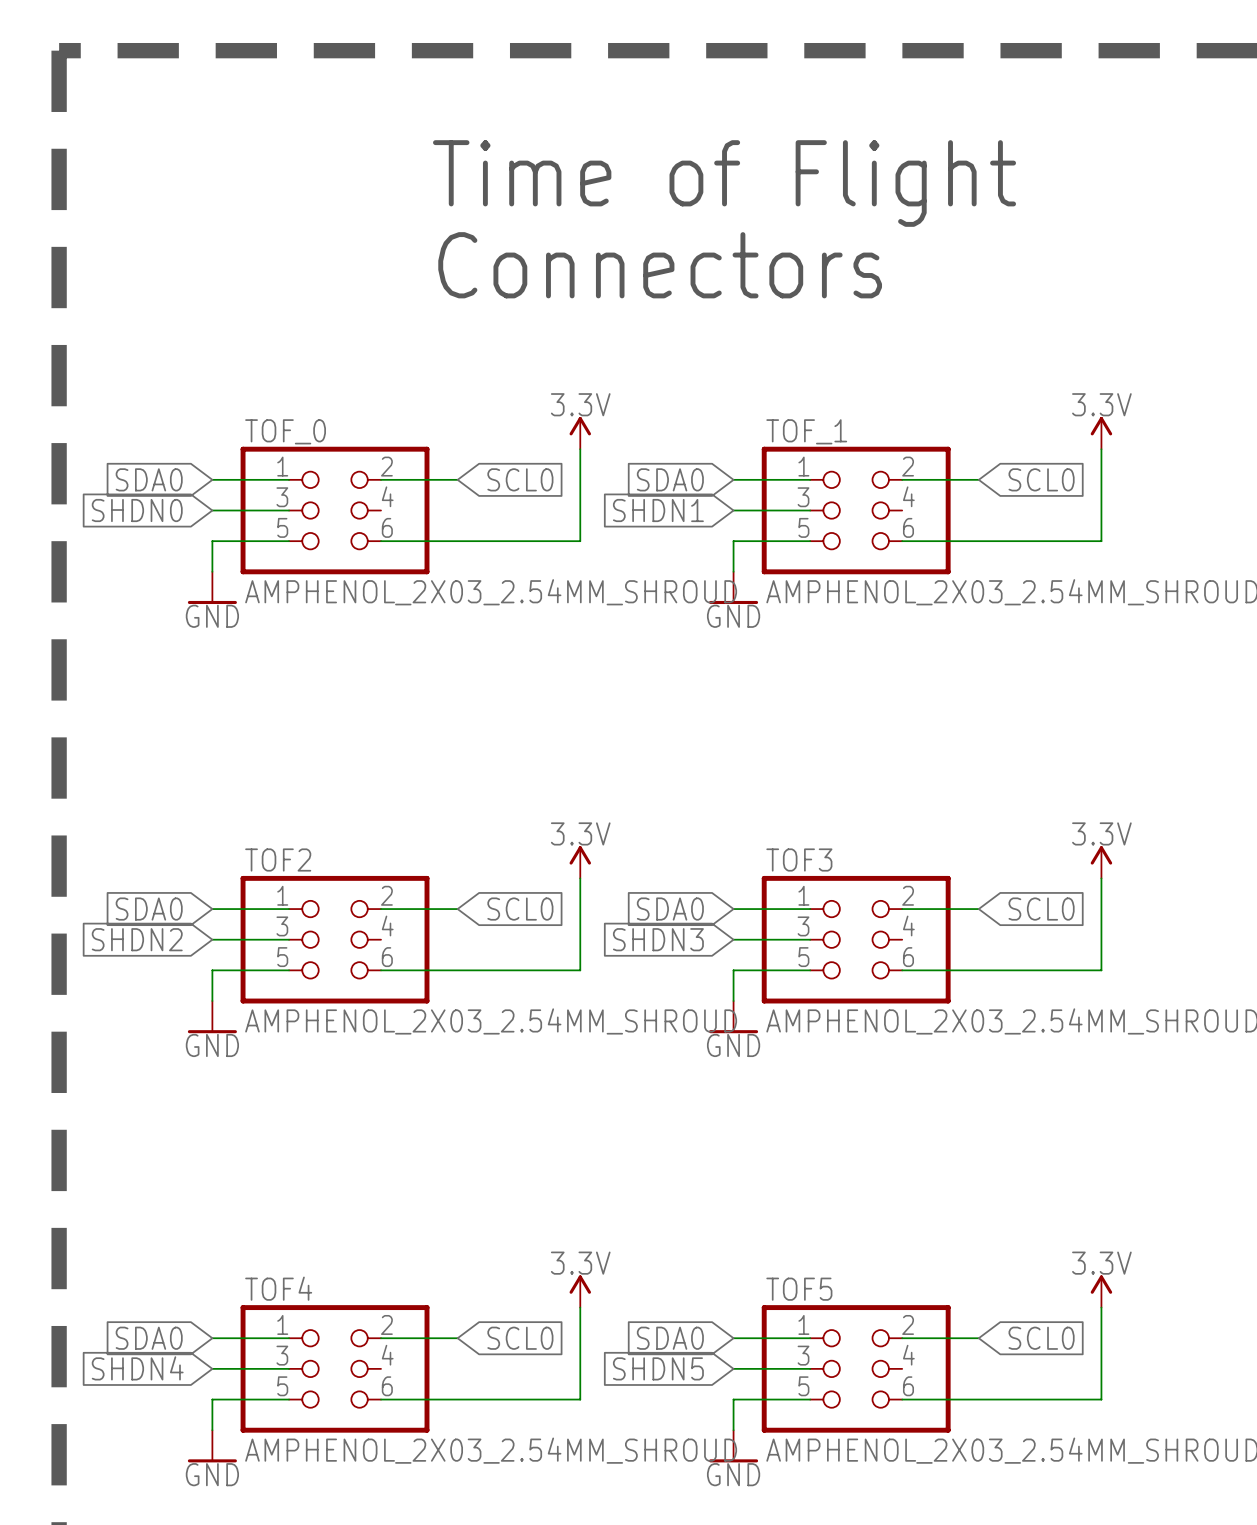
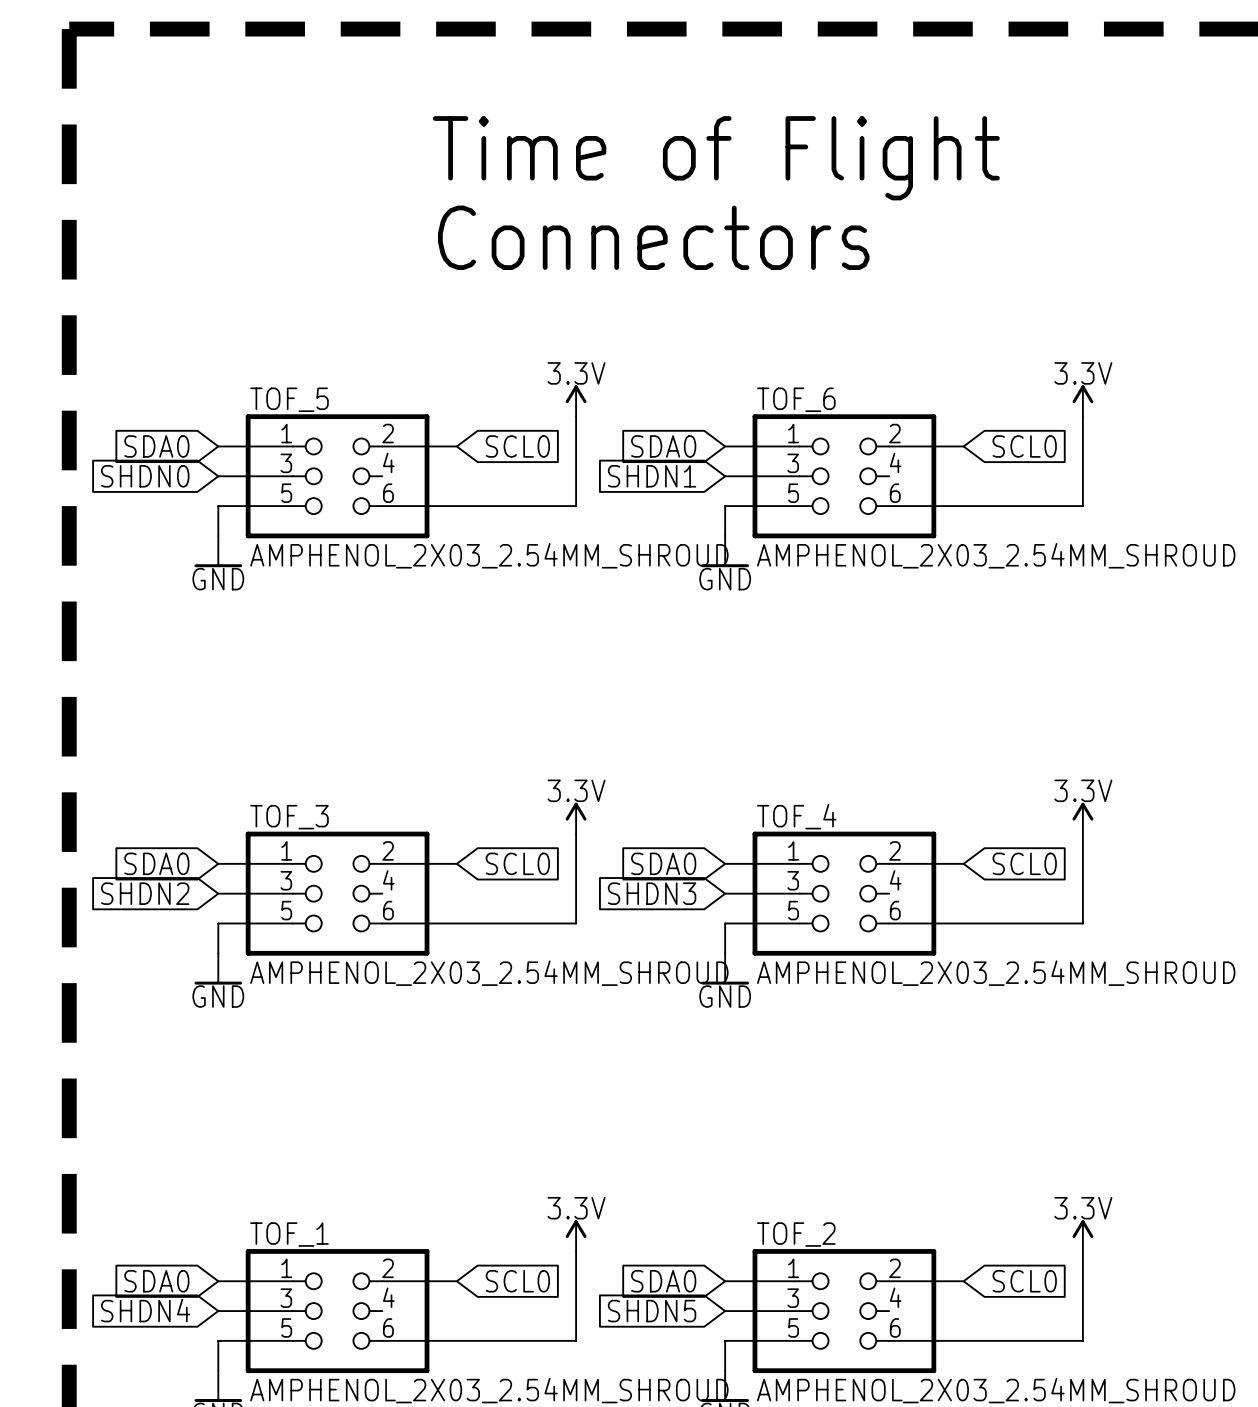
TOF_0 name: TOF_0 (285, 431) -> TOF_5 (289, 399)
TOF_1 name: TOF_1 (806, 431) -> TOF_6 (796, 399)
TOF2 name: TOF2 (278, 859) -> TOF_3 (289, 817)
TOF3 name: TOF3 (799, 859) -> TOF_4 (796, 816)
TOF4 name: TOF4 (278, 1288) -> TOF_1 (289, 1234)
TOF5 name: TOF5 (799, 1289) -> TOF_2 (796, 1234)

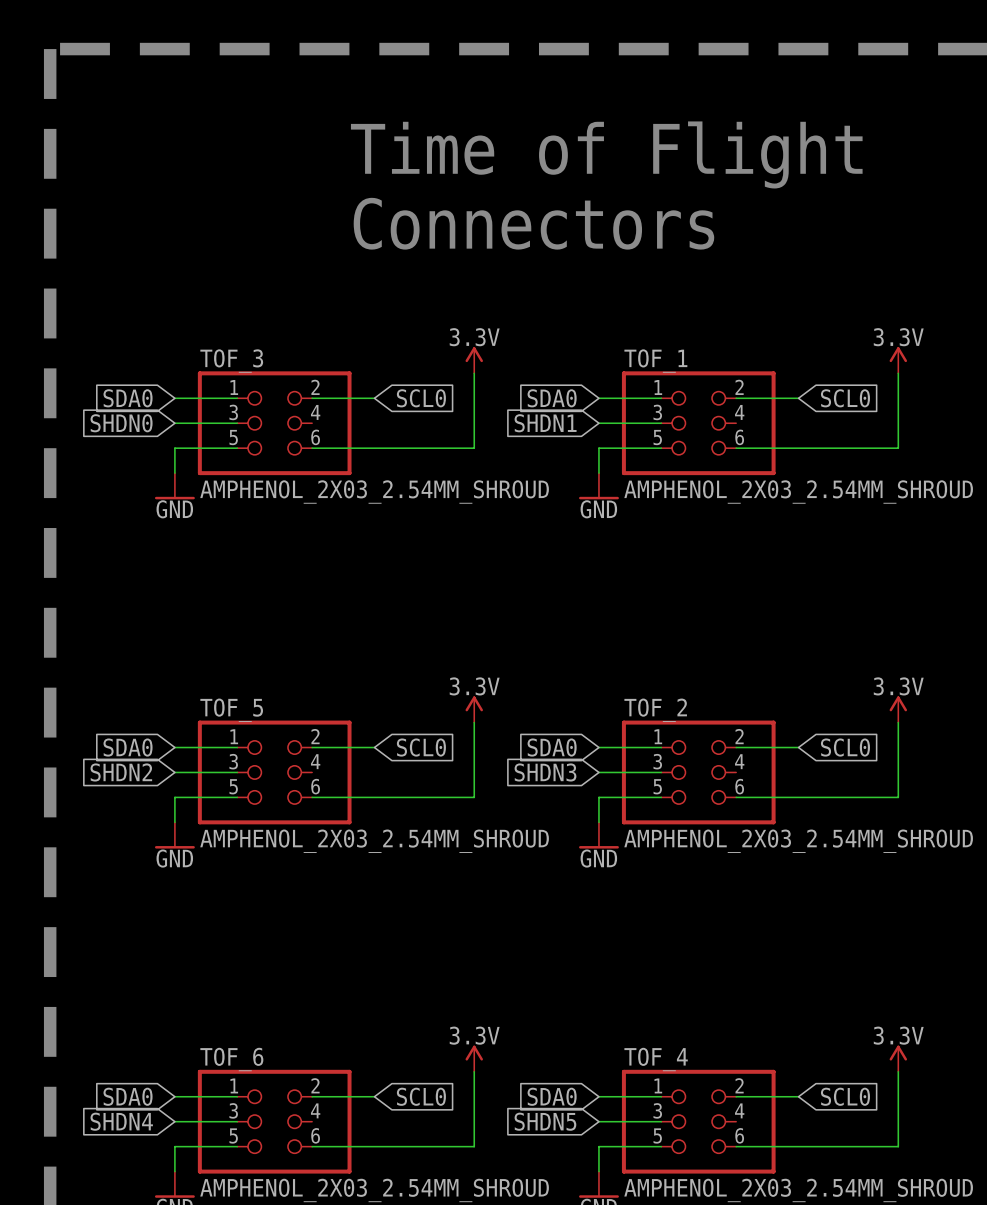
TOF_5 name: TOF_5 (289, 399) -> TOF_3 (231, 361)
TOF_6 name: TOF_6 (796, 399) -> TOF_1 (655, 361)
TOF_4 name: TOF_4 (796, 816) -> TOF_2 (655, 710)
TOF_3 name: TOF_3 (289, 817) -> TOF_5 (231, 710)
TOF_1 name: TOF_1 (289, 1234) -> TOF_6 (231, 1059)
TOF_2 name: TOF_2 (796, 1234) -> TOF_4 (656, 1059)

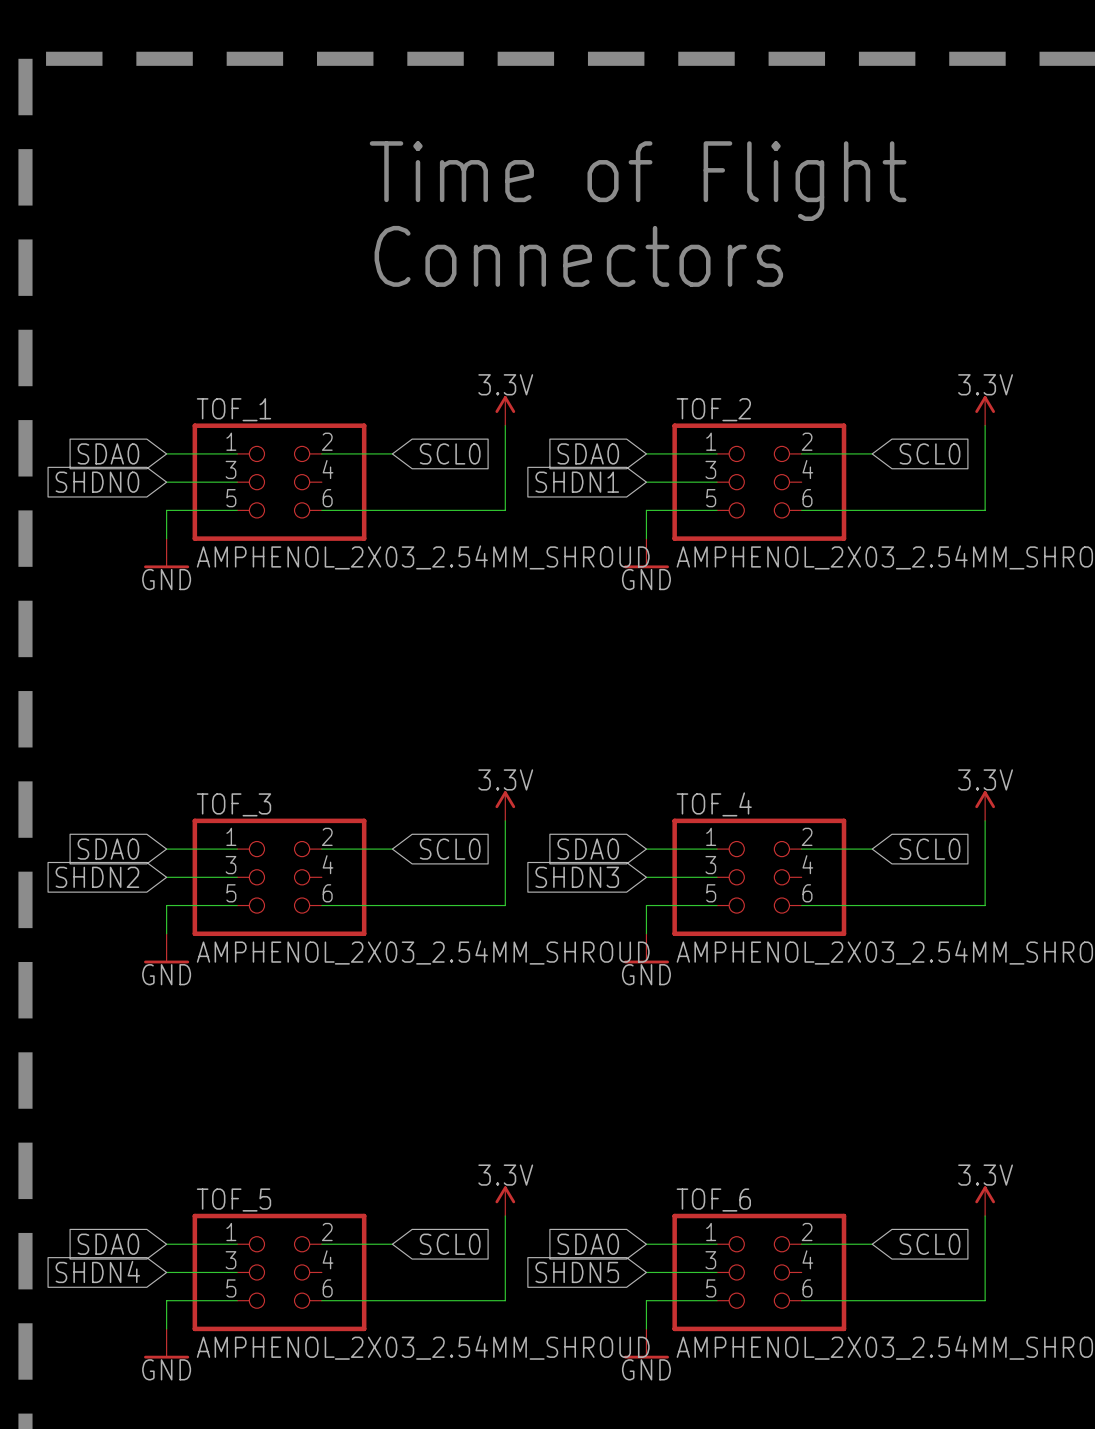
TOF_3 name: TOF_3 (231, 361) -> TOF_1 (233, 409)
TOF_1 name: TOF_1 (655, 361) -> TOF_2 (713, 409)
TOF_5 name: TOF_5 (231, 710) -> TOF_3 (233, 804)
TOF_2 name: TOF_2 (655, 710) -> TOF_4 (714, 804)
TOF_6 name: TOF_6 (231, 1059) -> TOF_5 (233, 1200)
TOF_4 name: TOF_4 (656, 1059) -> TOF_6 (713, 1200)

